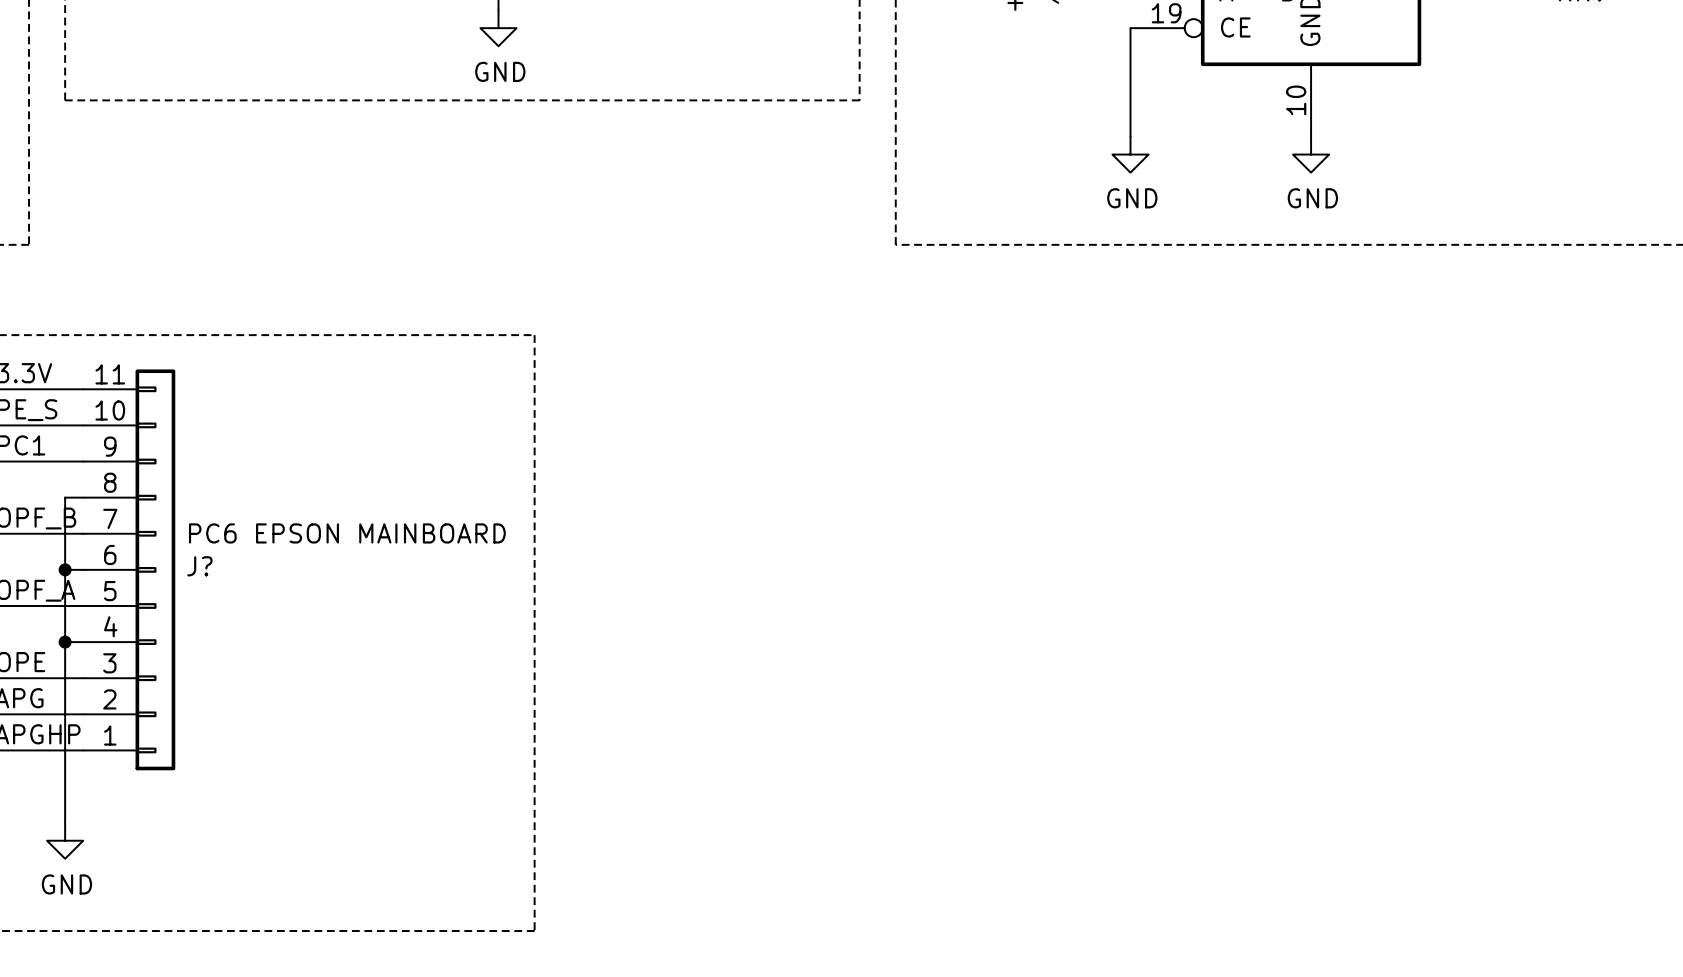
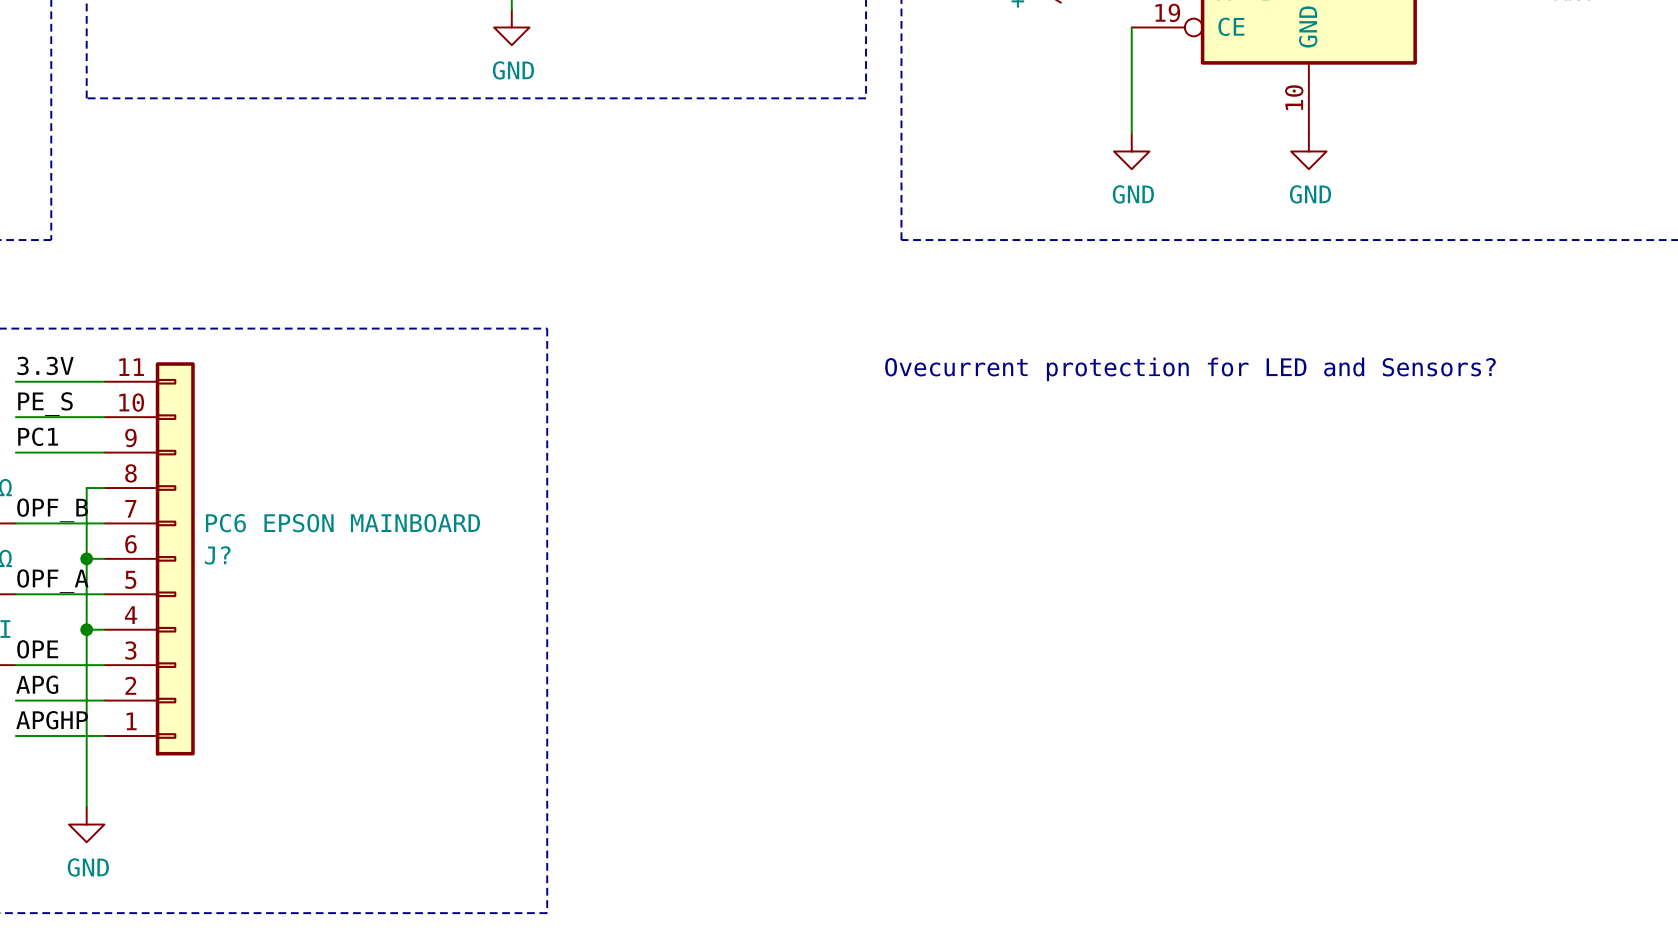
text: none -> Ovecurrent protection for LED and Sensors? (1190, 369)

